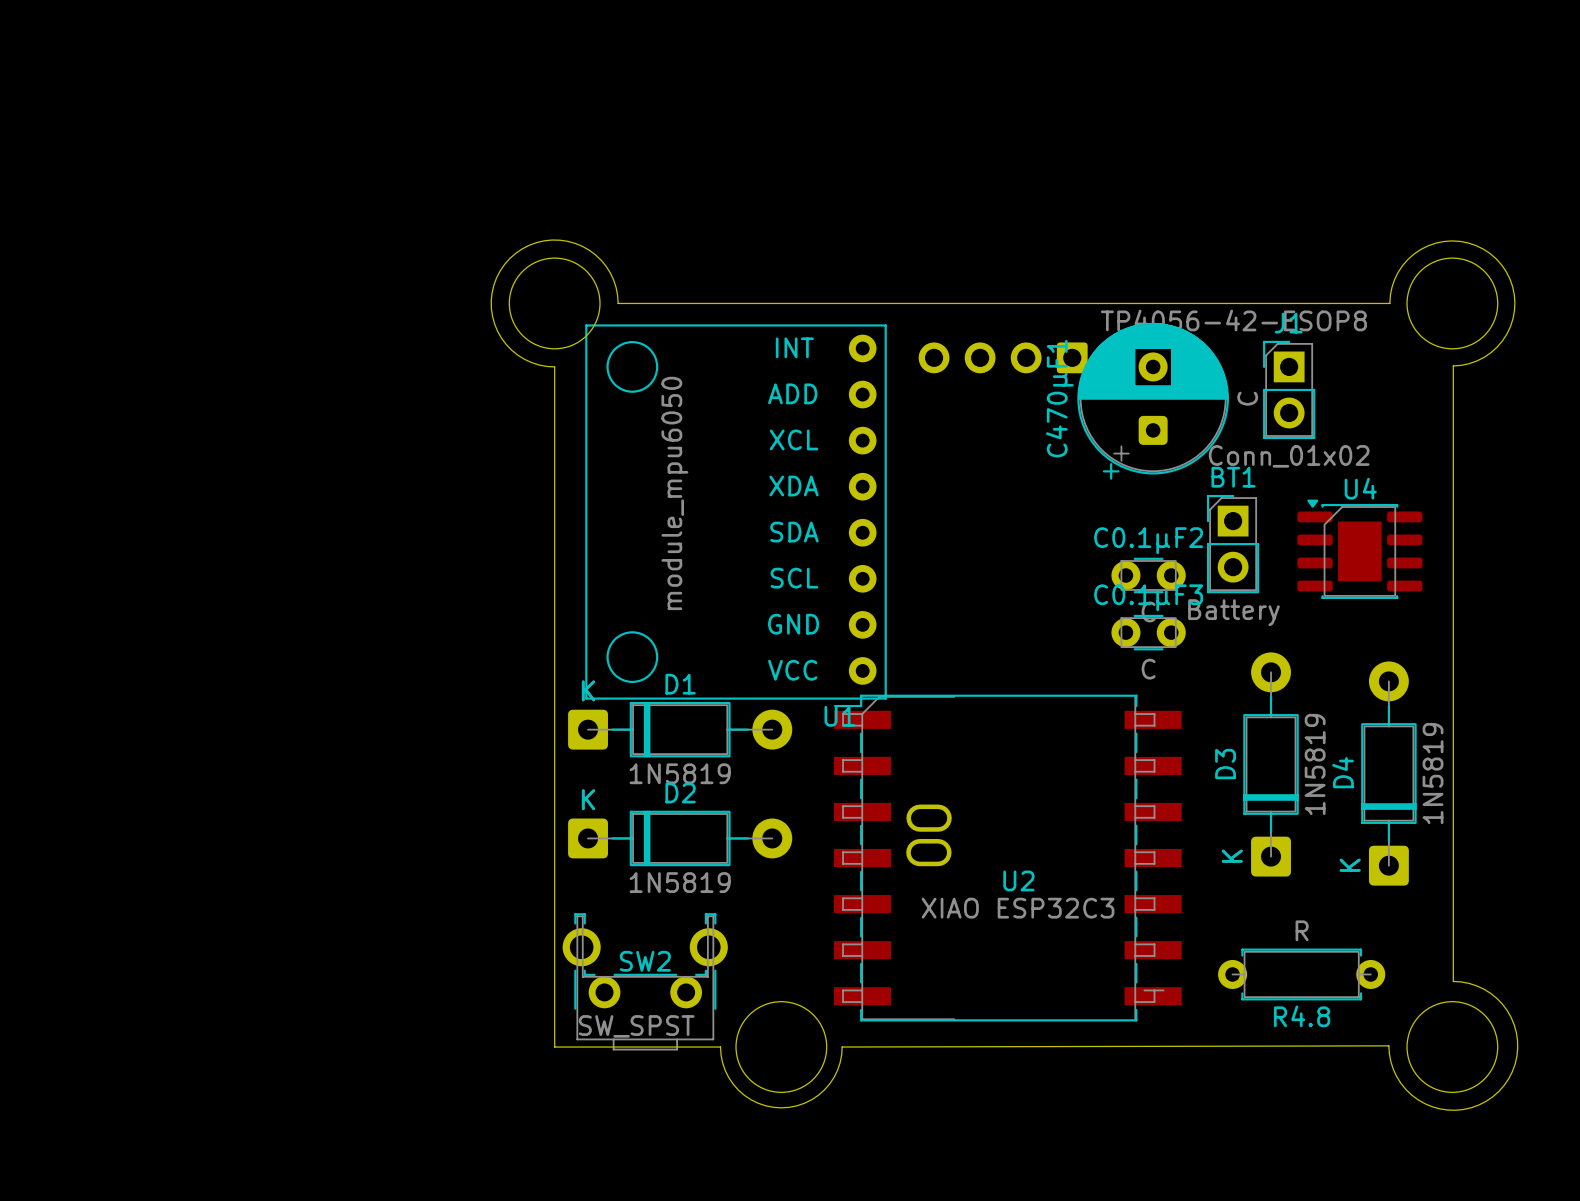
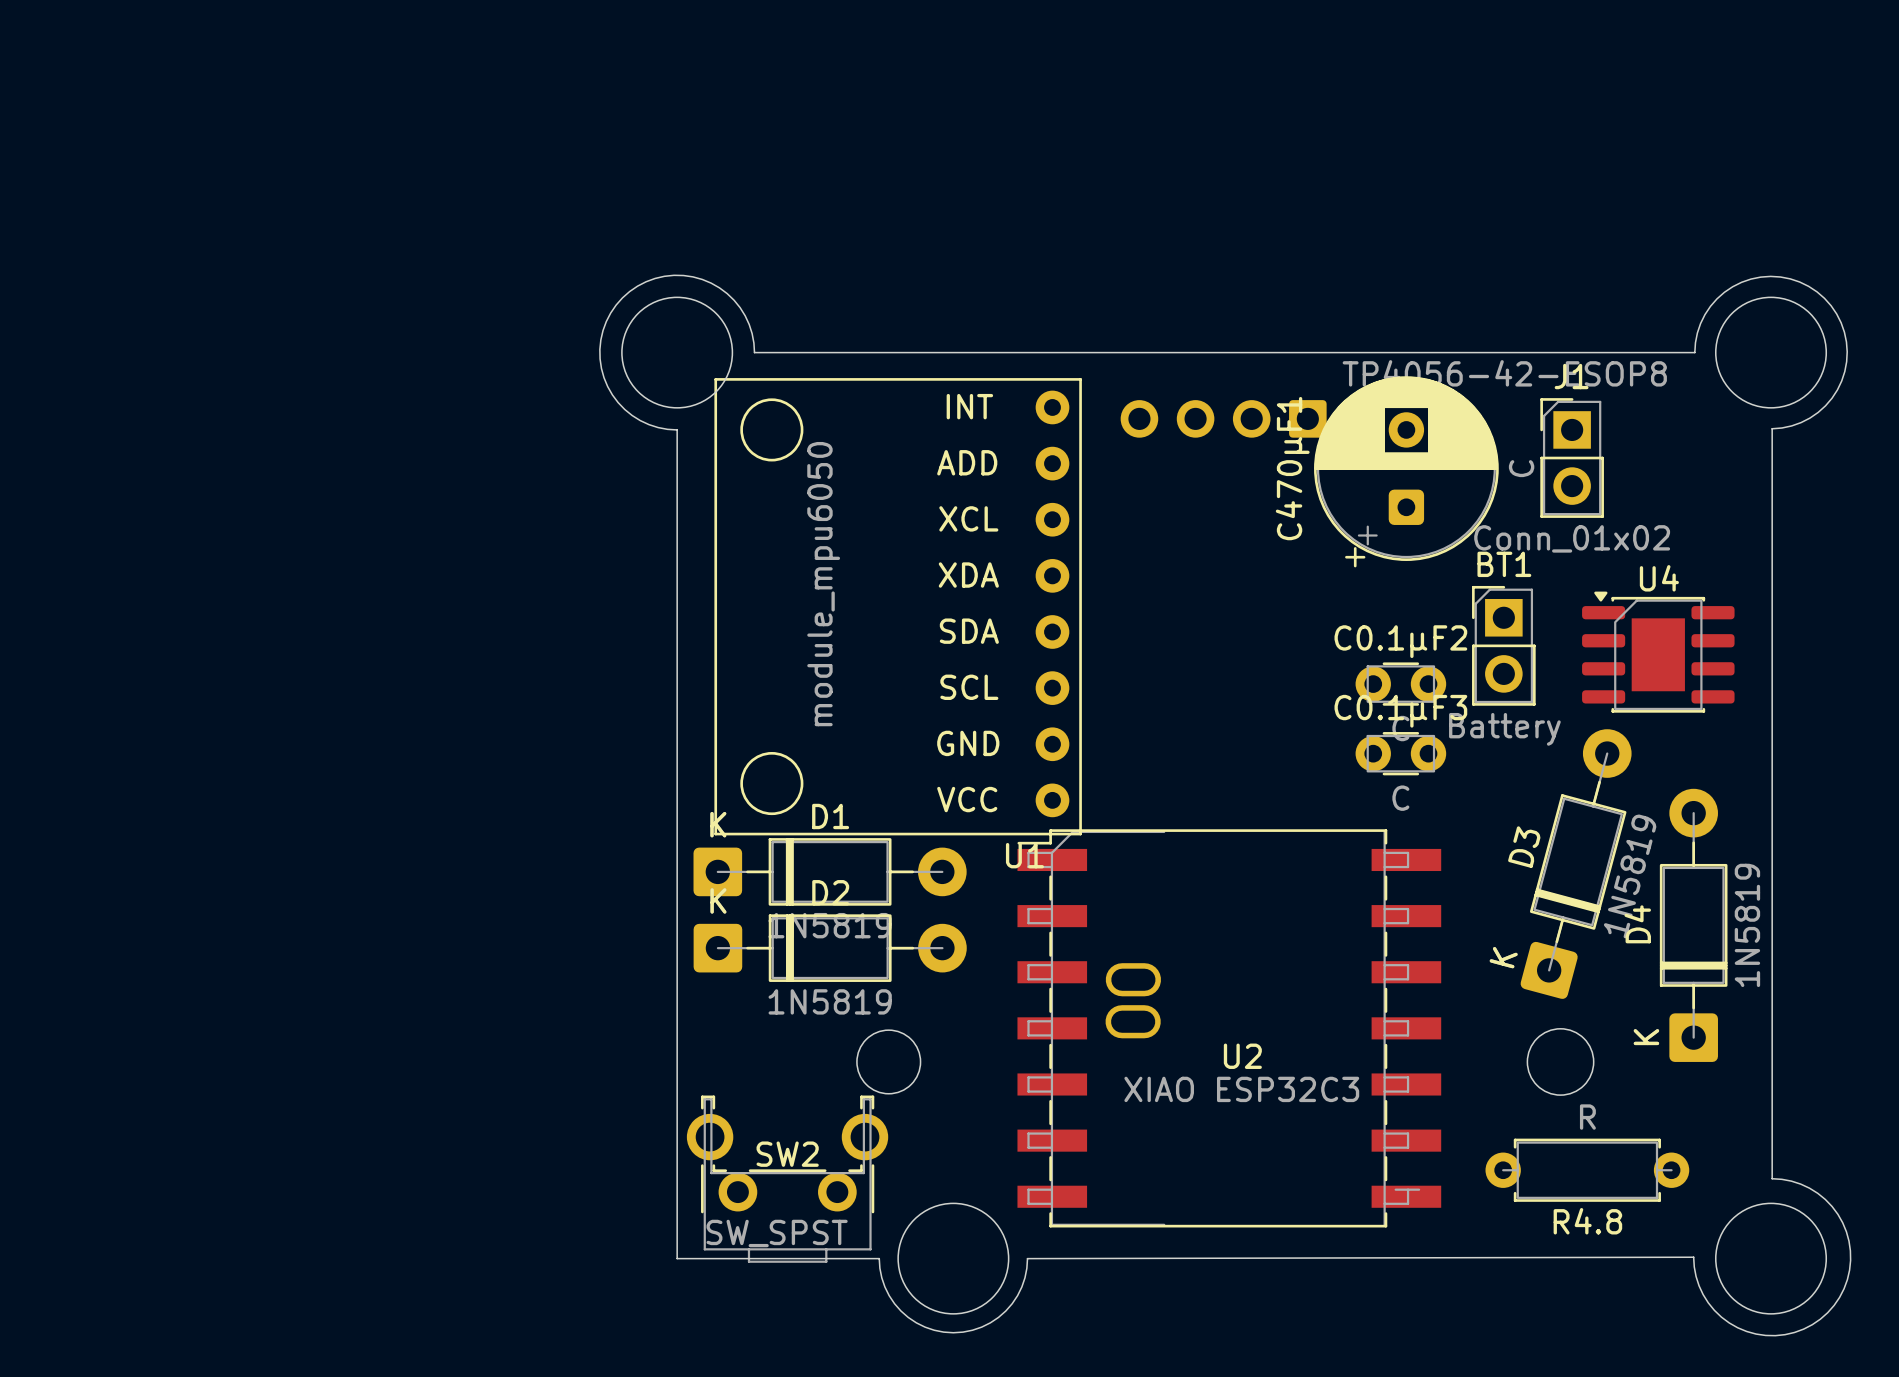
D3 rotation: 0° (1271, 764) -> 15° clockwise (1576, 864)
D2 position: (680, 838) -> (830, 948)
round board edge: none -> [1526, 1028, 1595, 1096]
round board edge: none -> [856, 1029, 922, 1095]

